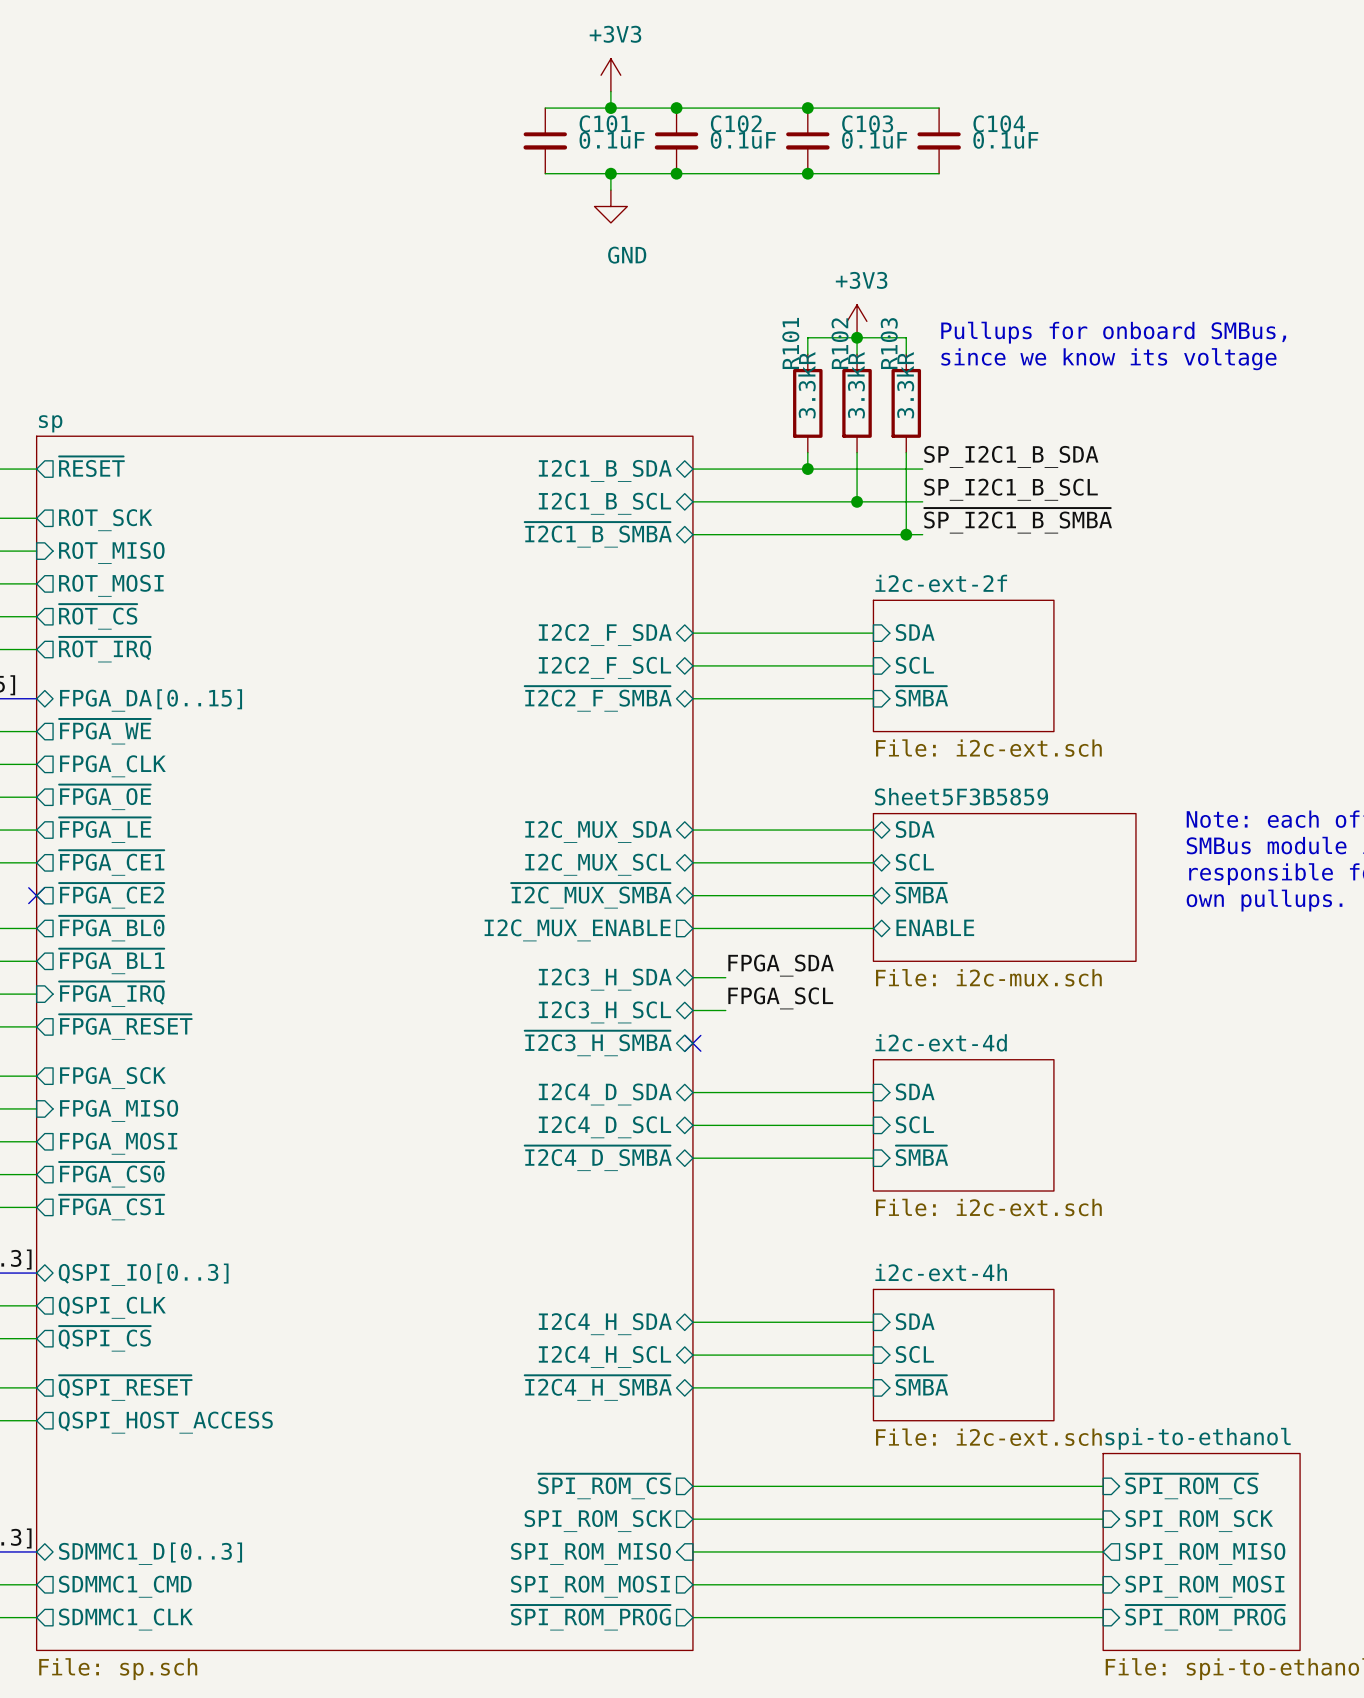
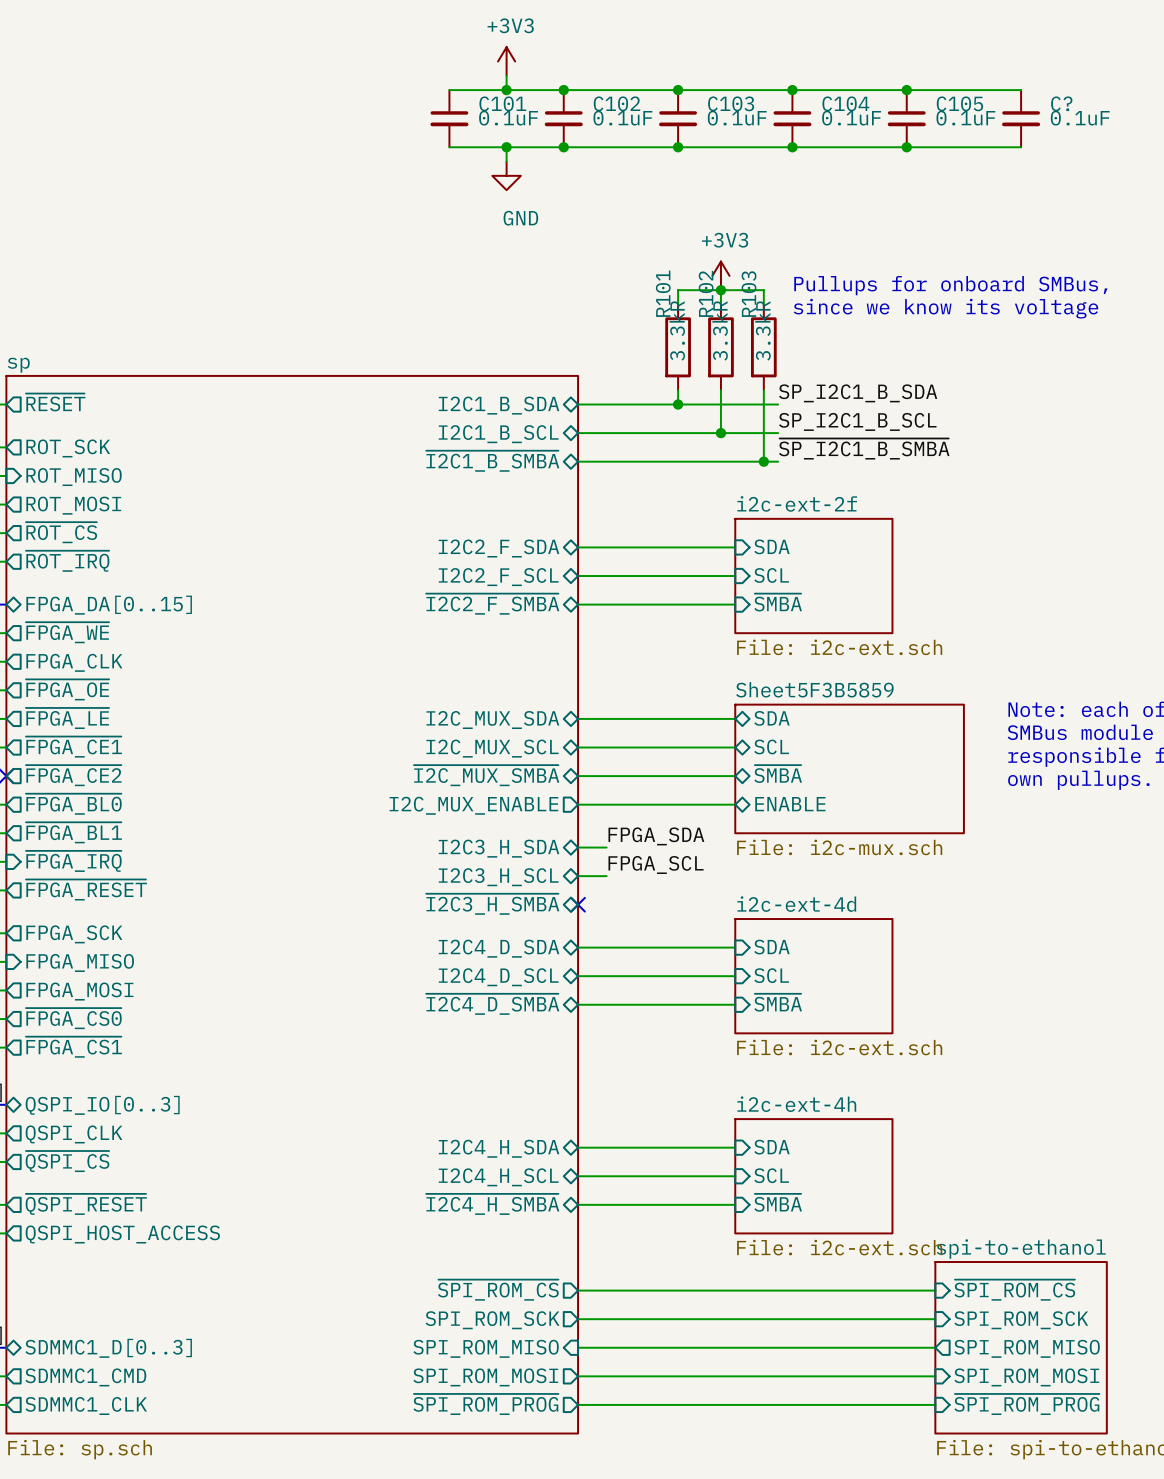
wire: none -> (792, 90) (1021, 90)
junction: none -> (792, 90)
junction: none -> (906, 90)
C105: none -> 0.1uF (906, 118)
C?: none -> 0.1uF (1021, 118)
wire: none -> (792, 147) (1021, 147)
junction: none -> (792, 147)
junction: none -> (906, 147)

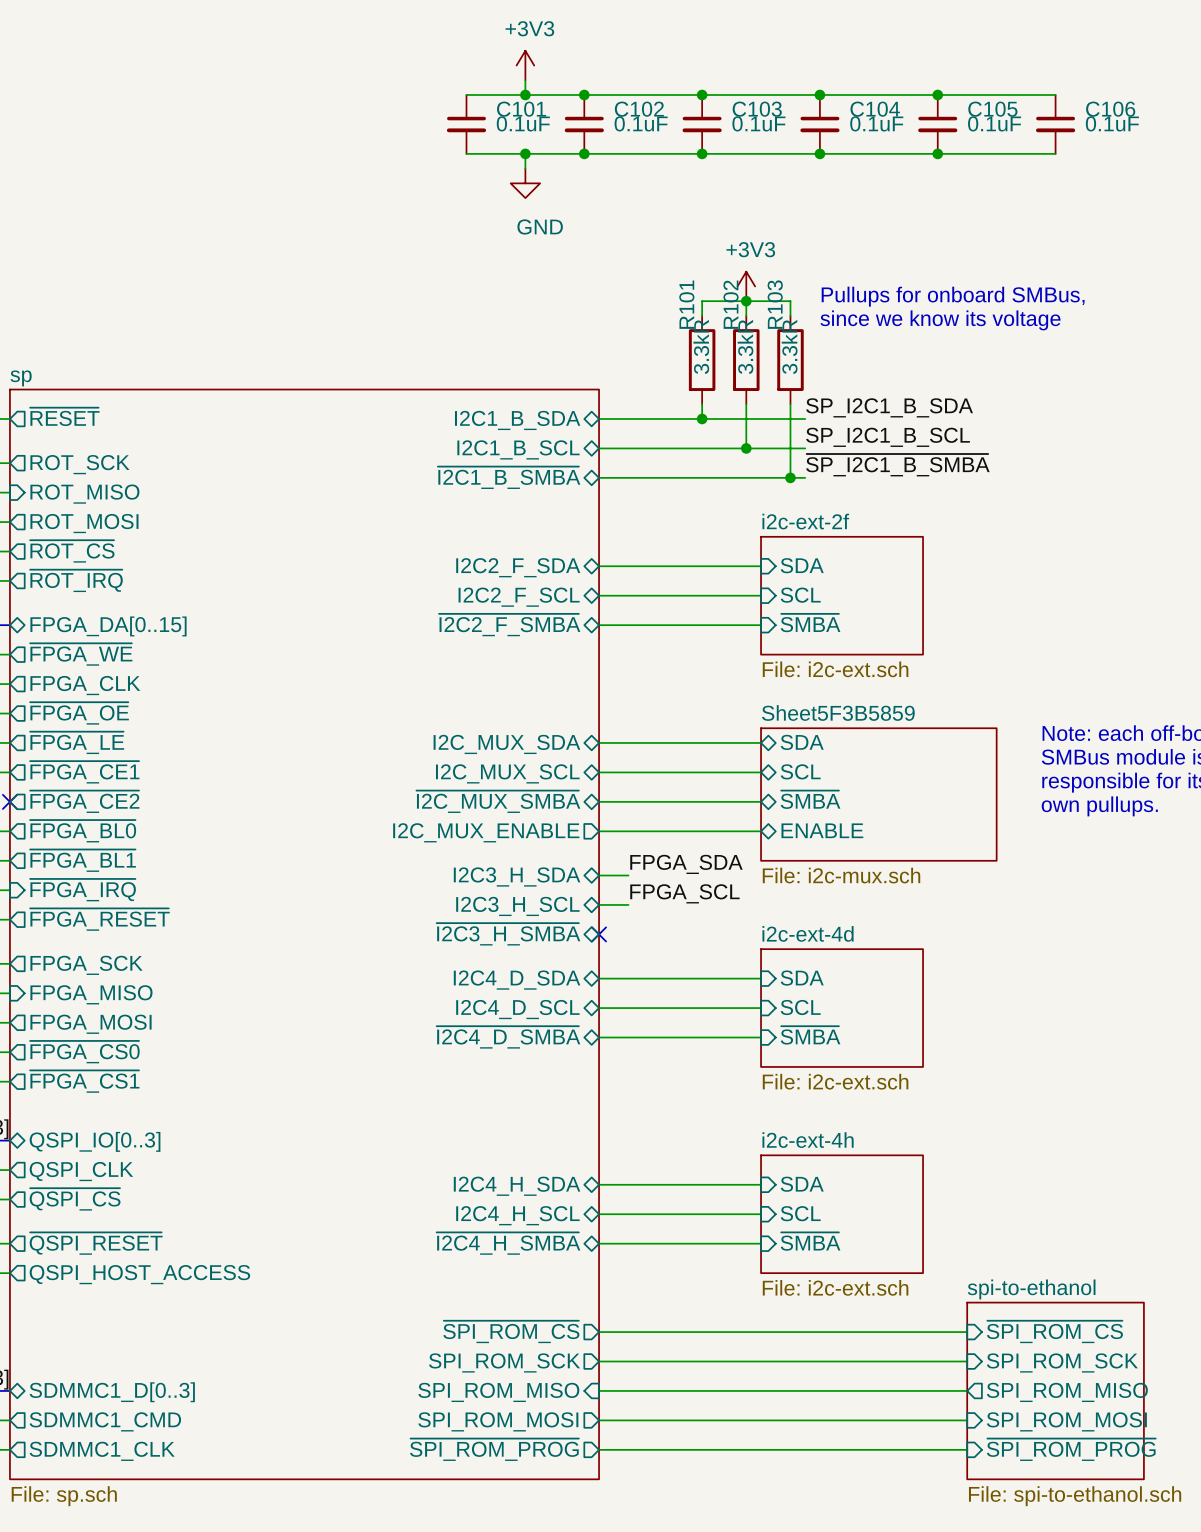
C? name: C? (1061, 103) -> C106 (1110, 109)

